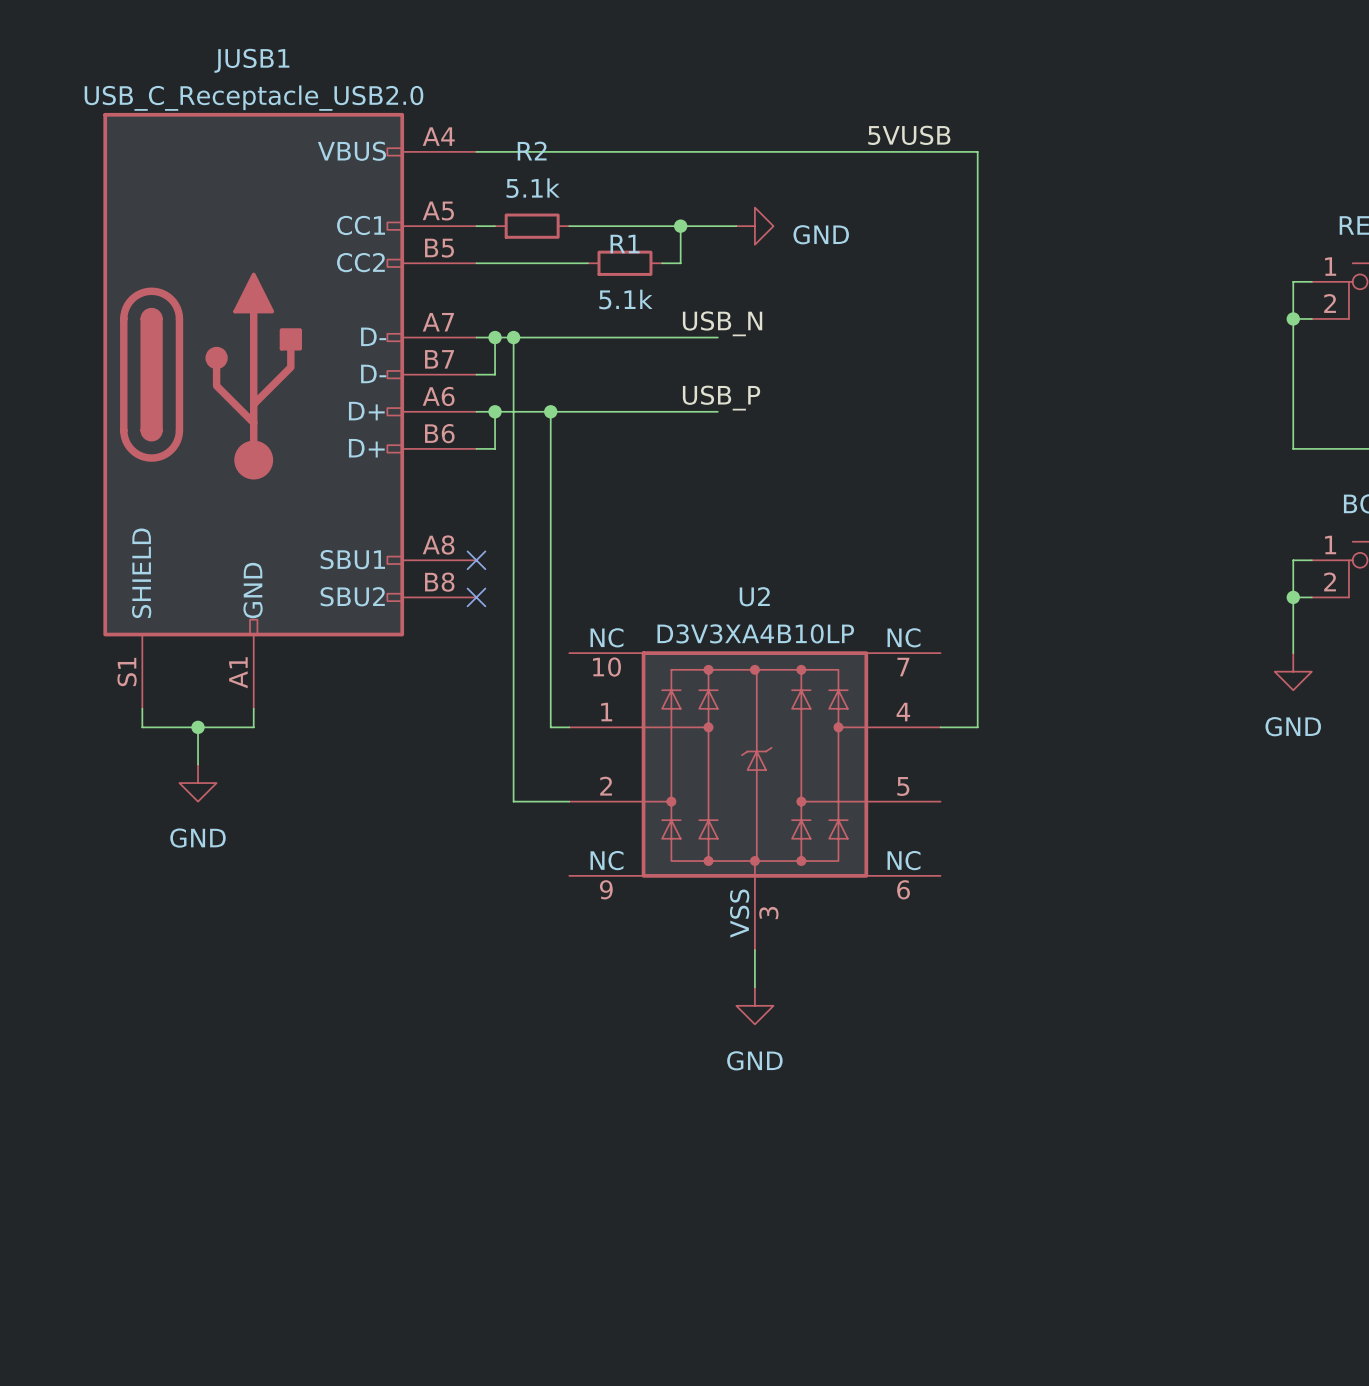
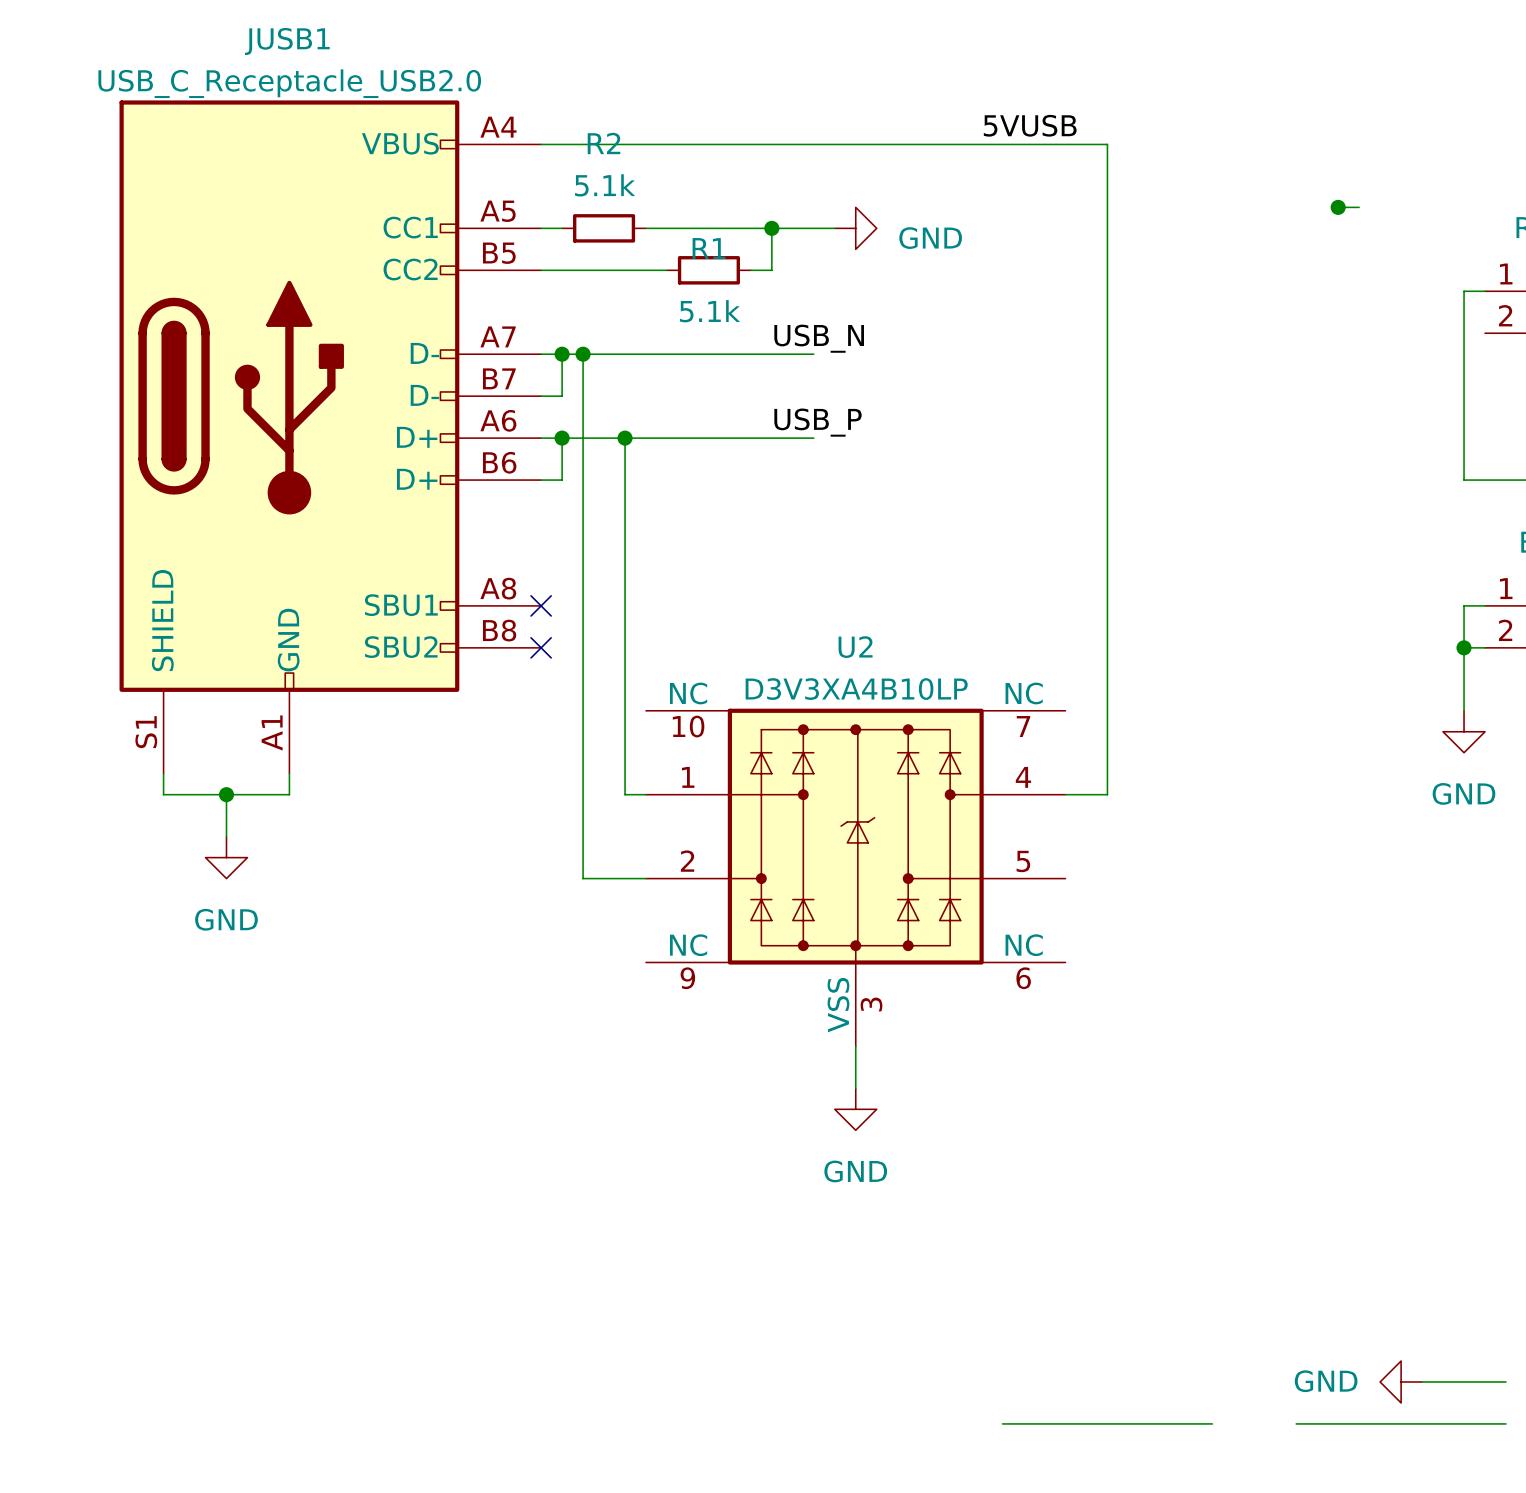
junction: none -> (1338, 207)
wire: (1293, 318) (1311, 318) -> (1338, 207) (1359, 207)
junction: (1293, 318) -> none
power symbol: none -> GND (1401, 1381)
wire: none -> (1422, 1381) (1505, 1381)
wire: none -> (1002, 1423) (1212, 1423)
wire: none -> (1296, 1423) (1505, 1423)

